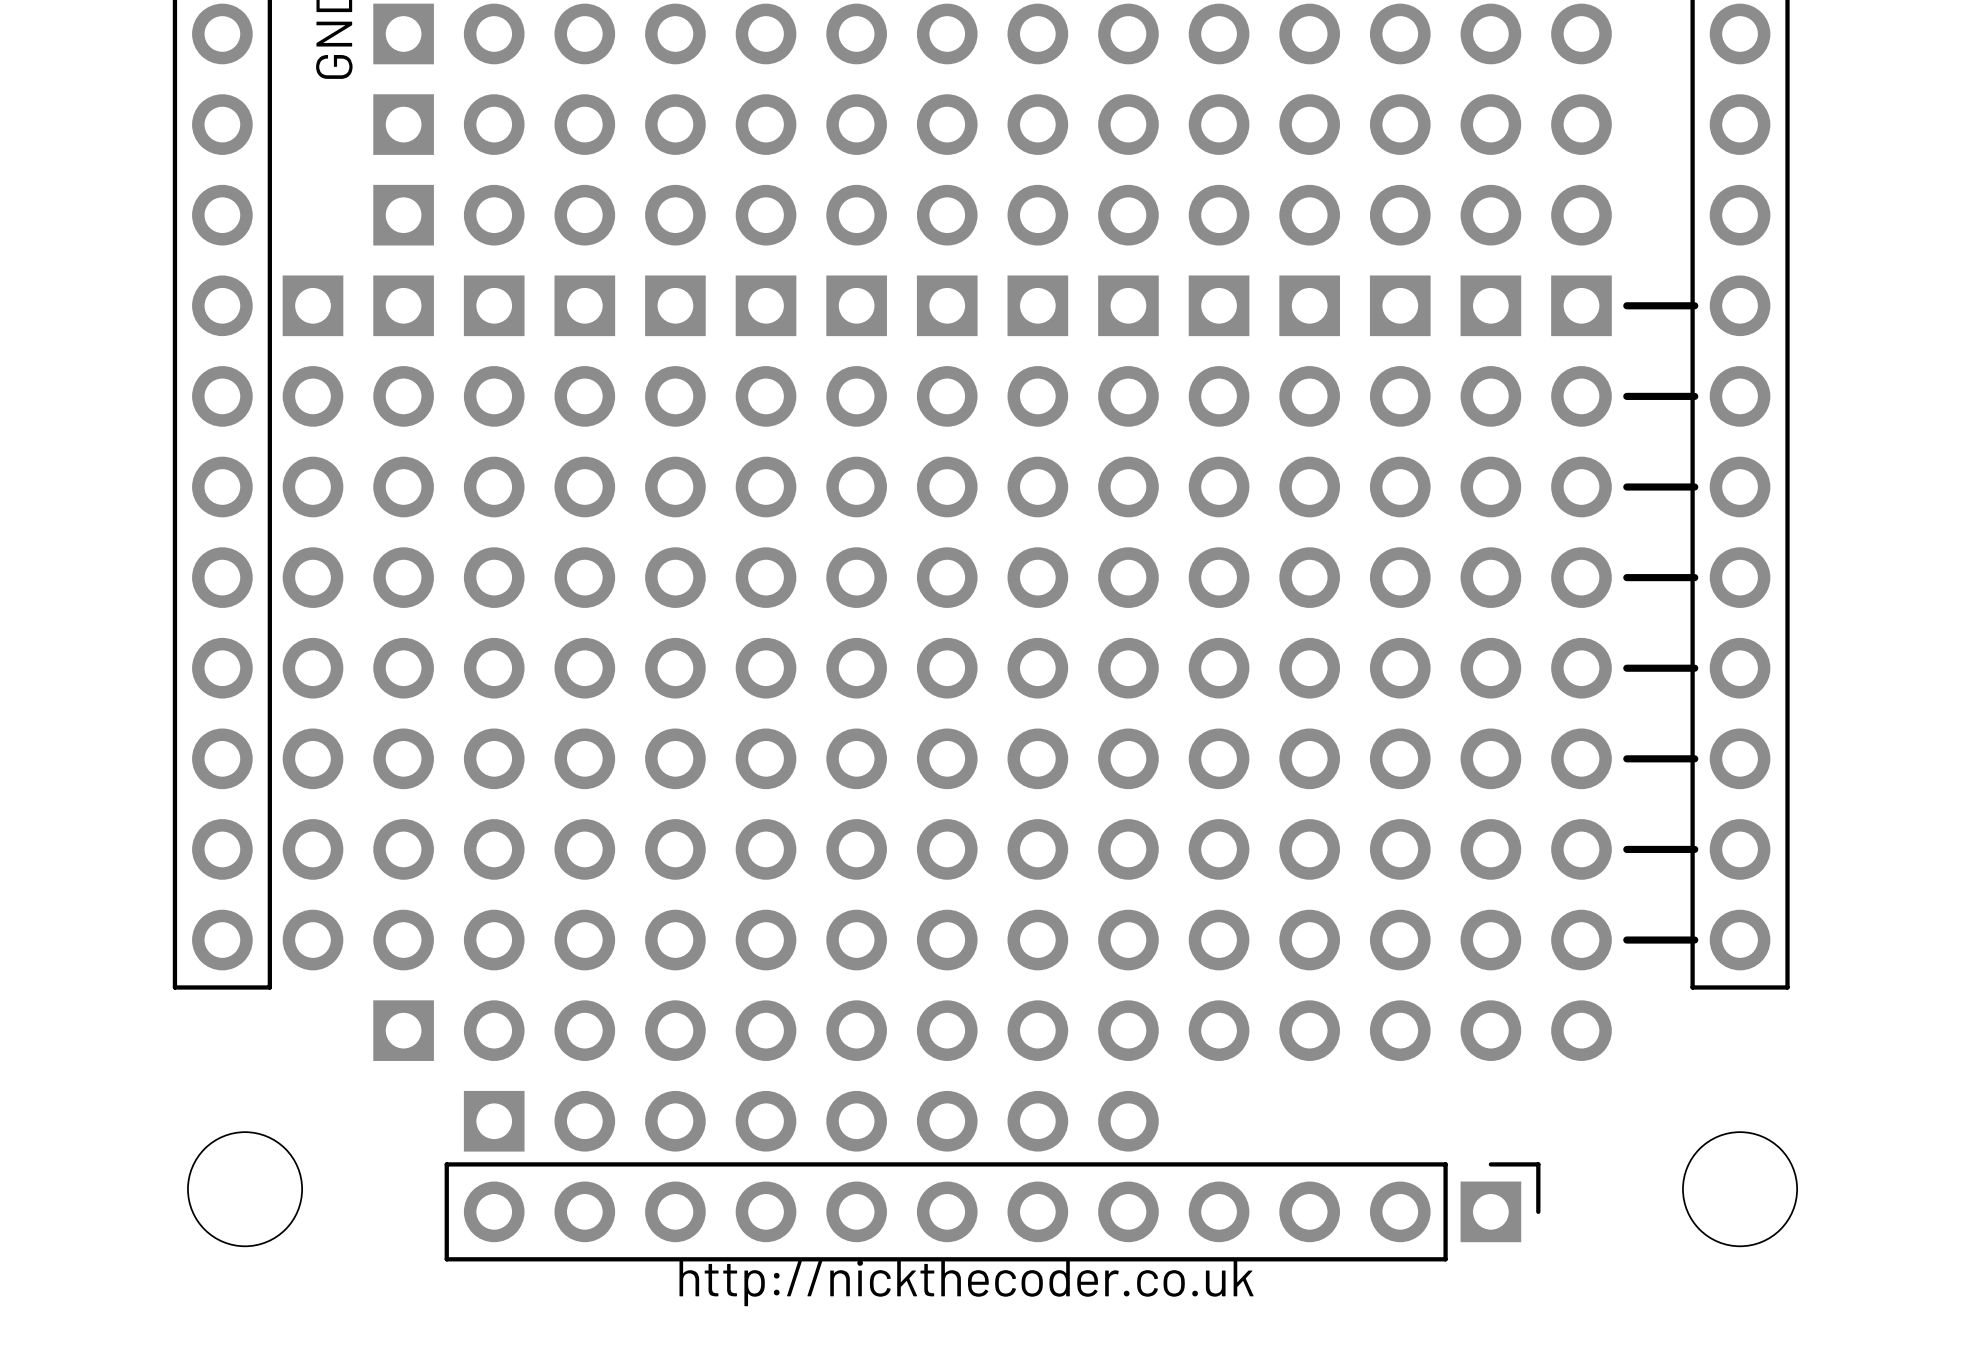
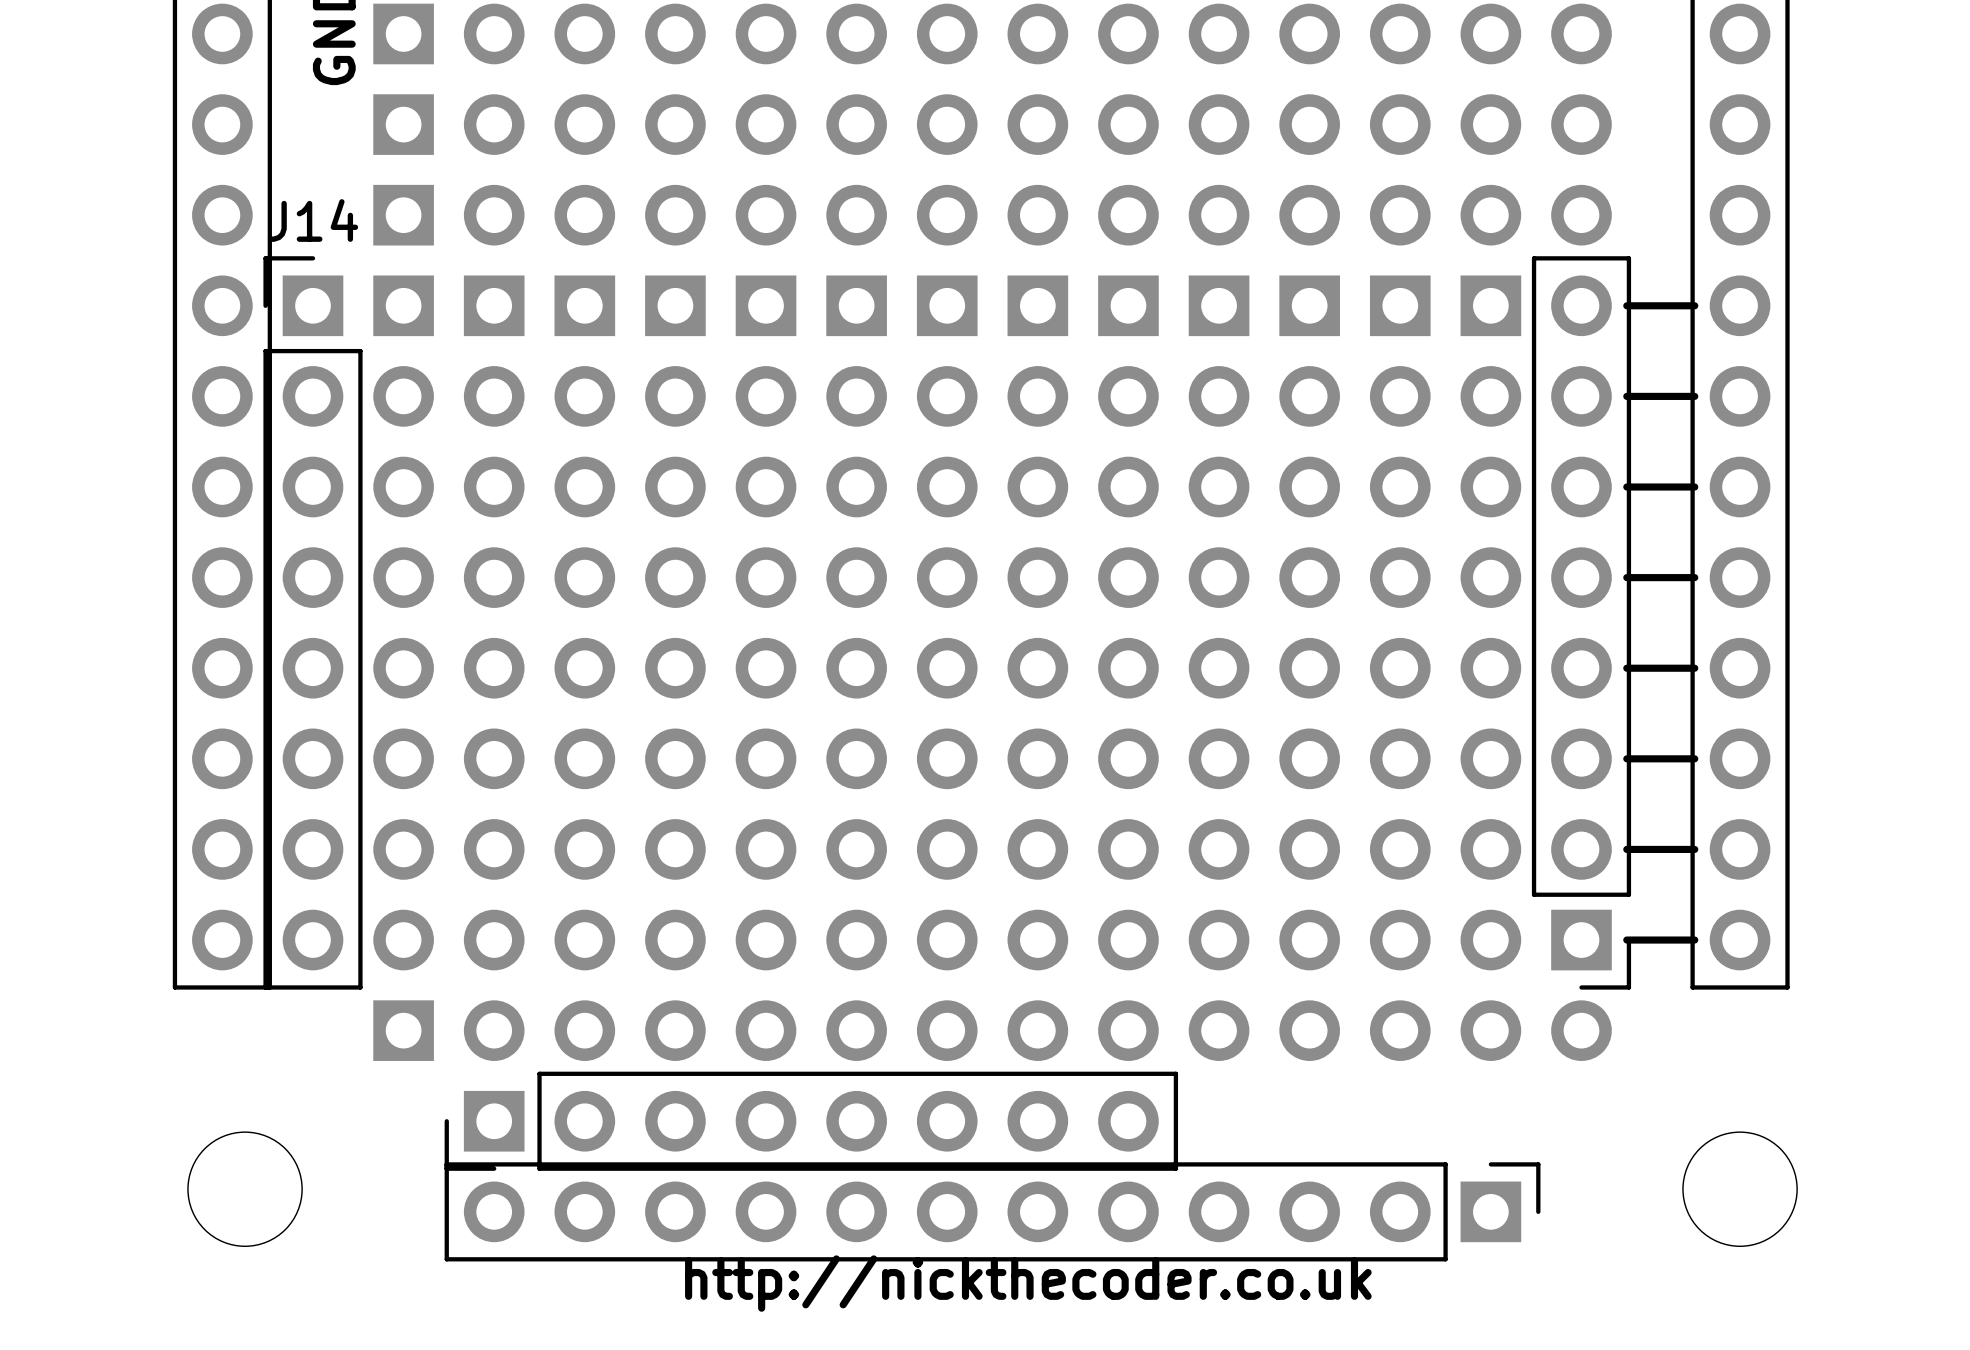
J14: none -> (312, 622)
part side: bottom (1581, 622) -> top (1581, 622)
part side: bottom (811, 1121) -> top (811, 1121)

